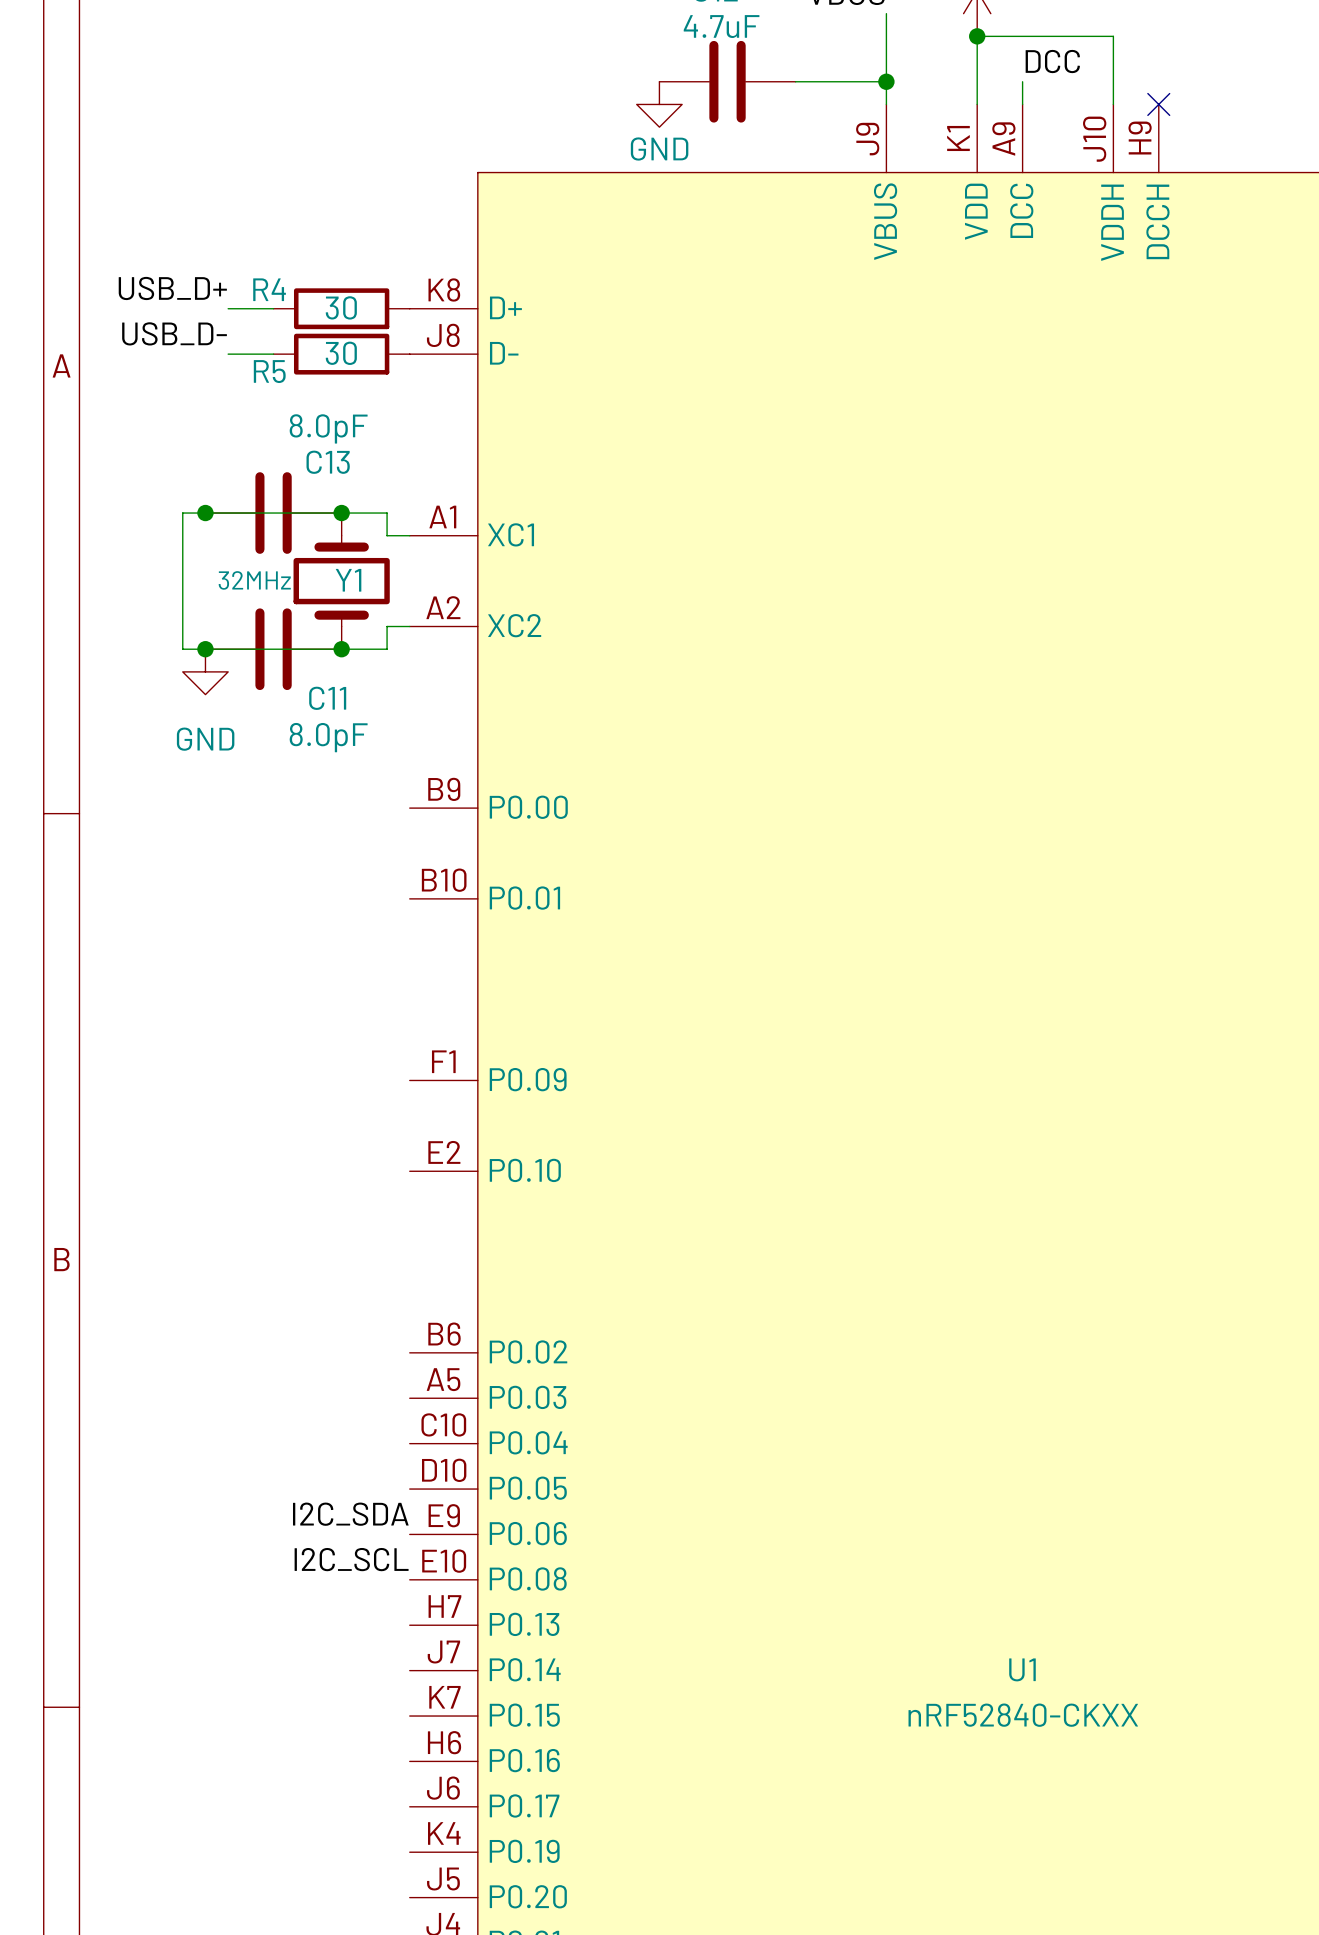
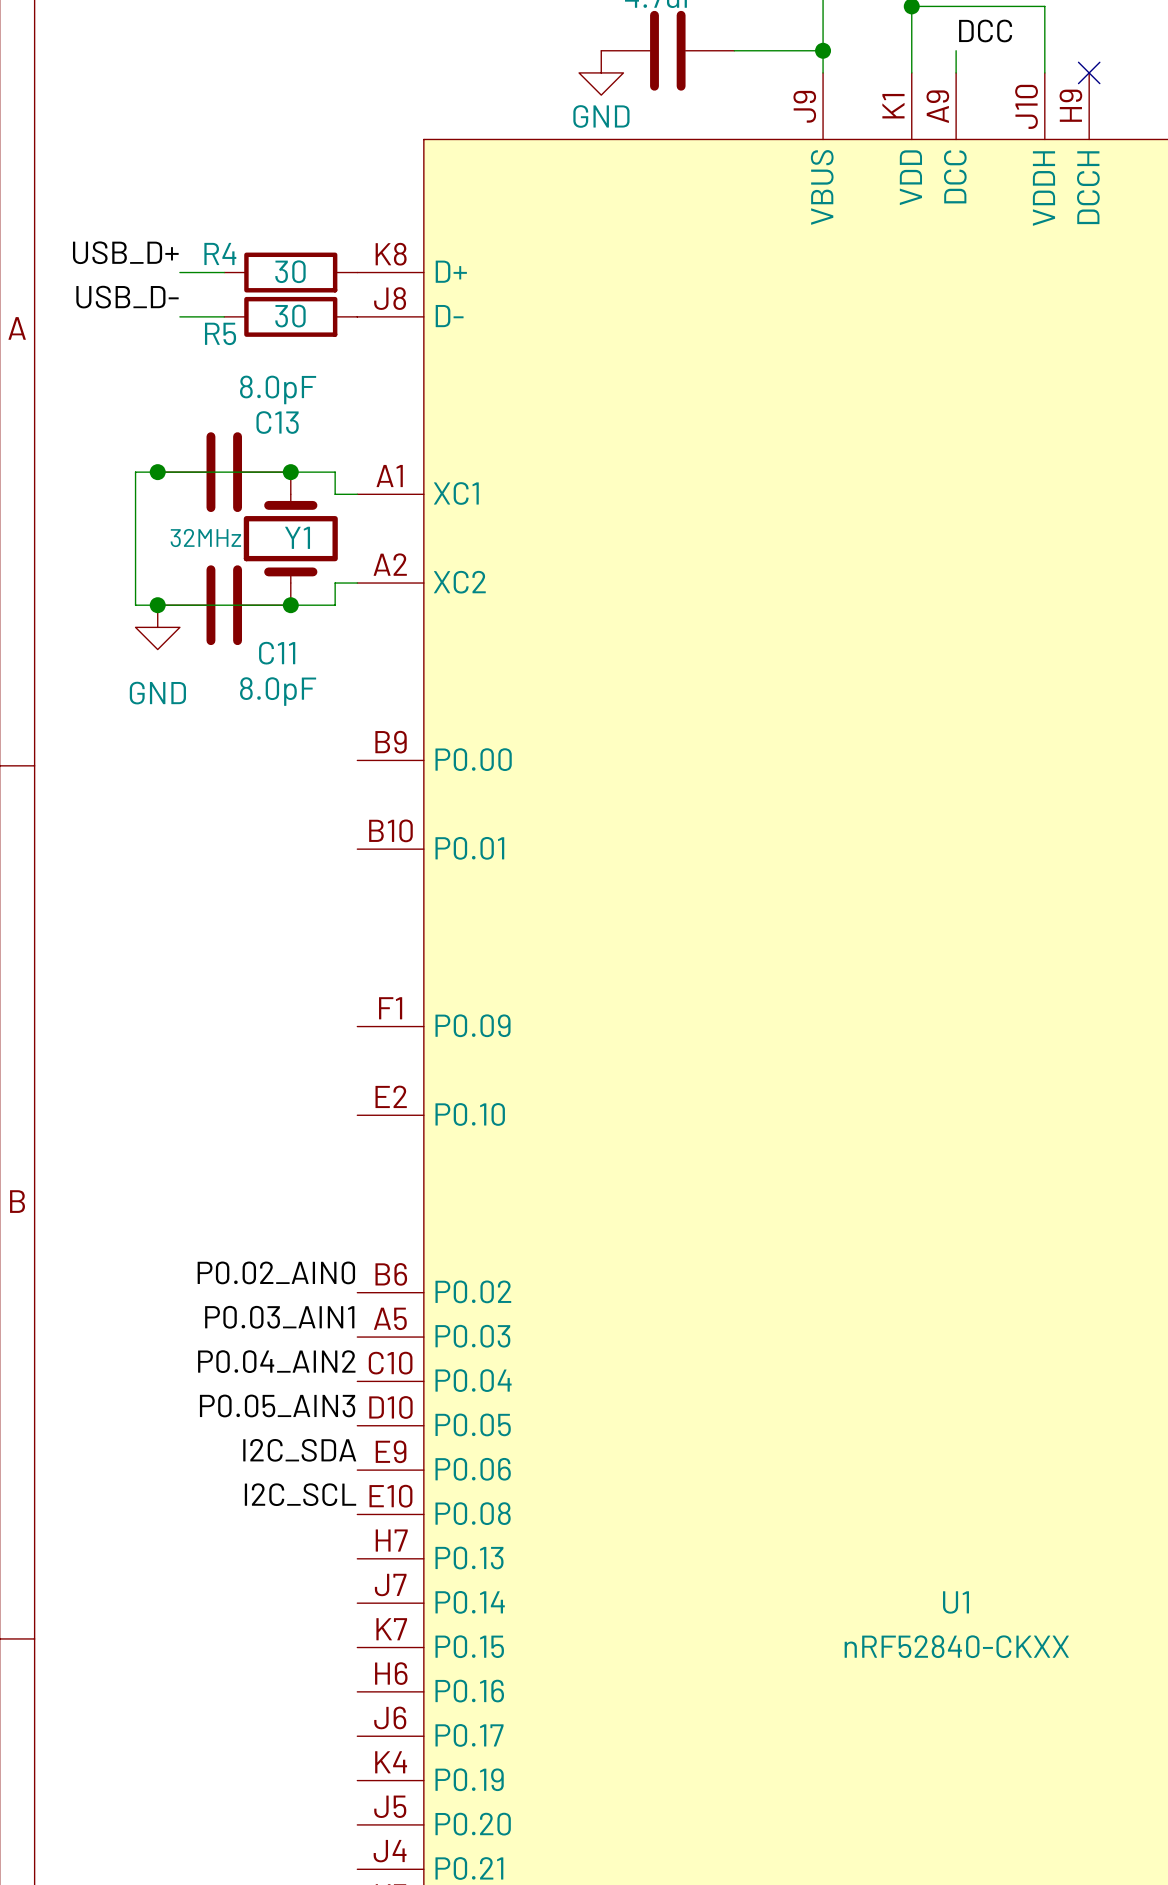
label: none -> P0.02_AIN0 (276, 1272)
label: none -> P0.03_AIN1 (279, 1317)
label: none -> P0.04_AIN2 (276, 1361)
label: none -> P0.05_AIN3 (277, 1405)

